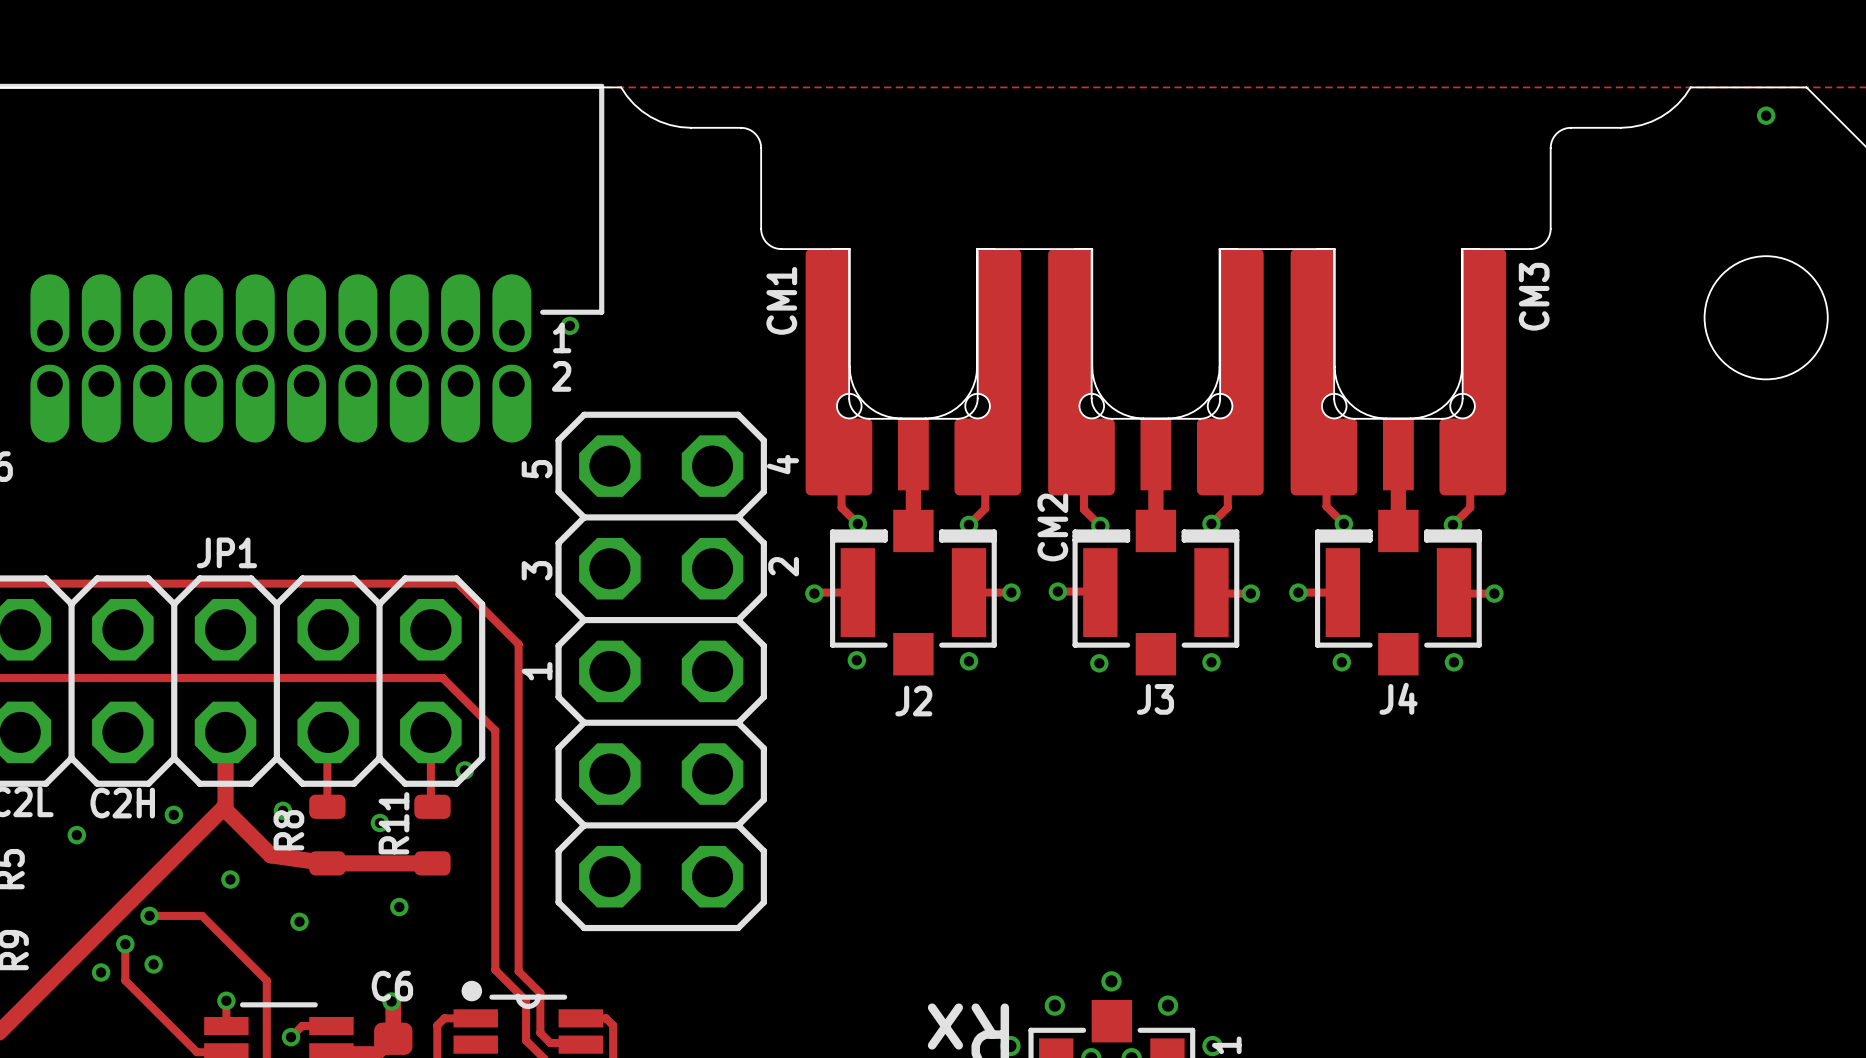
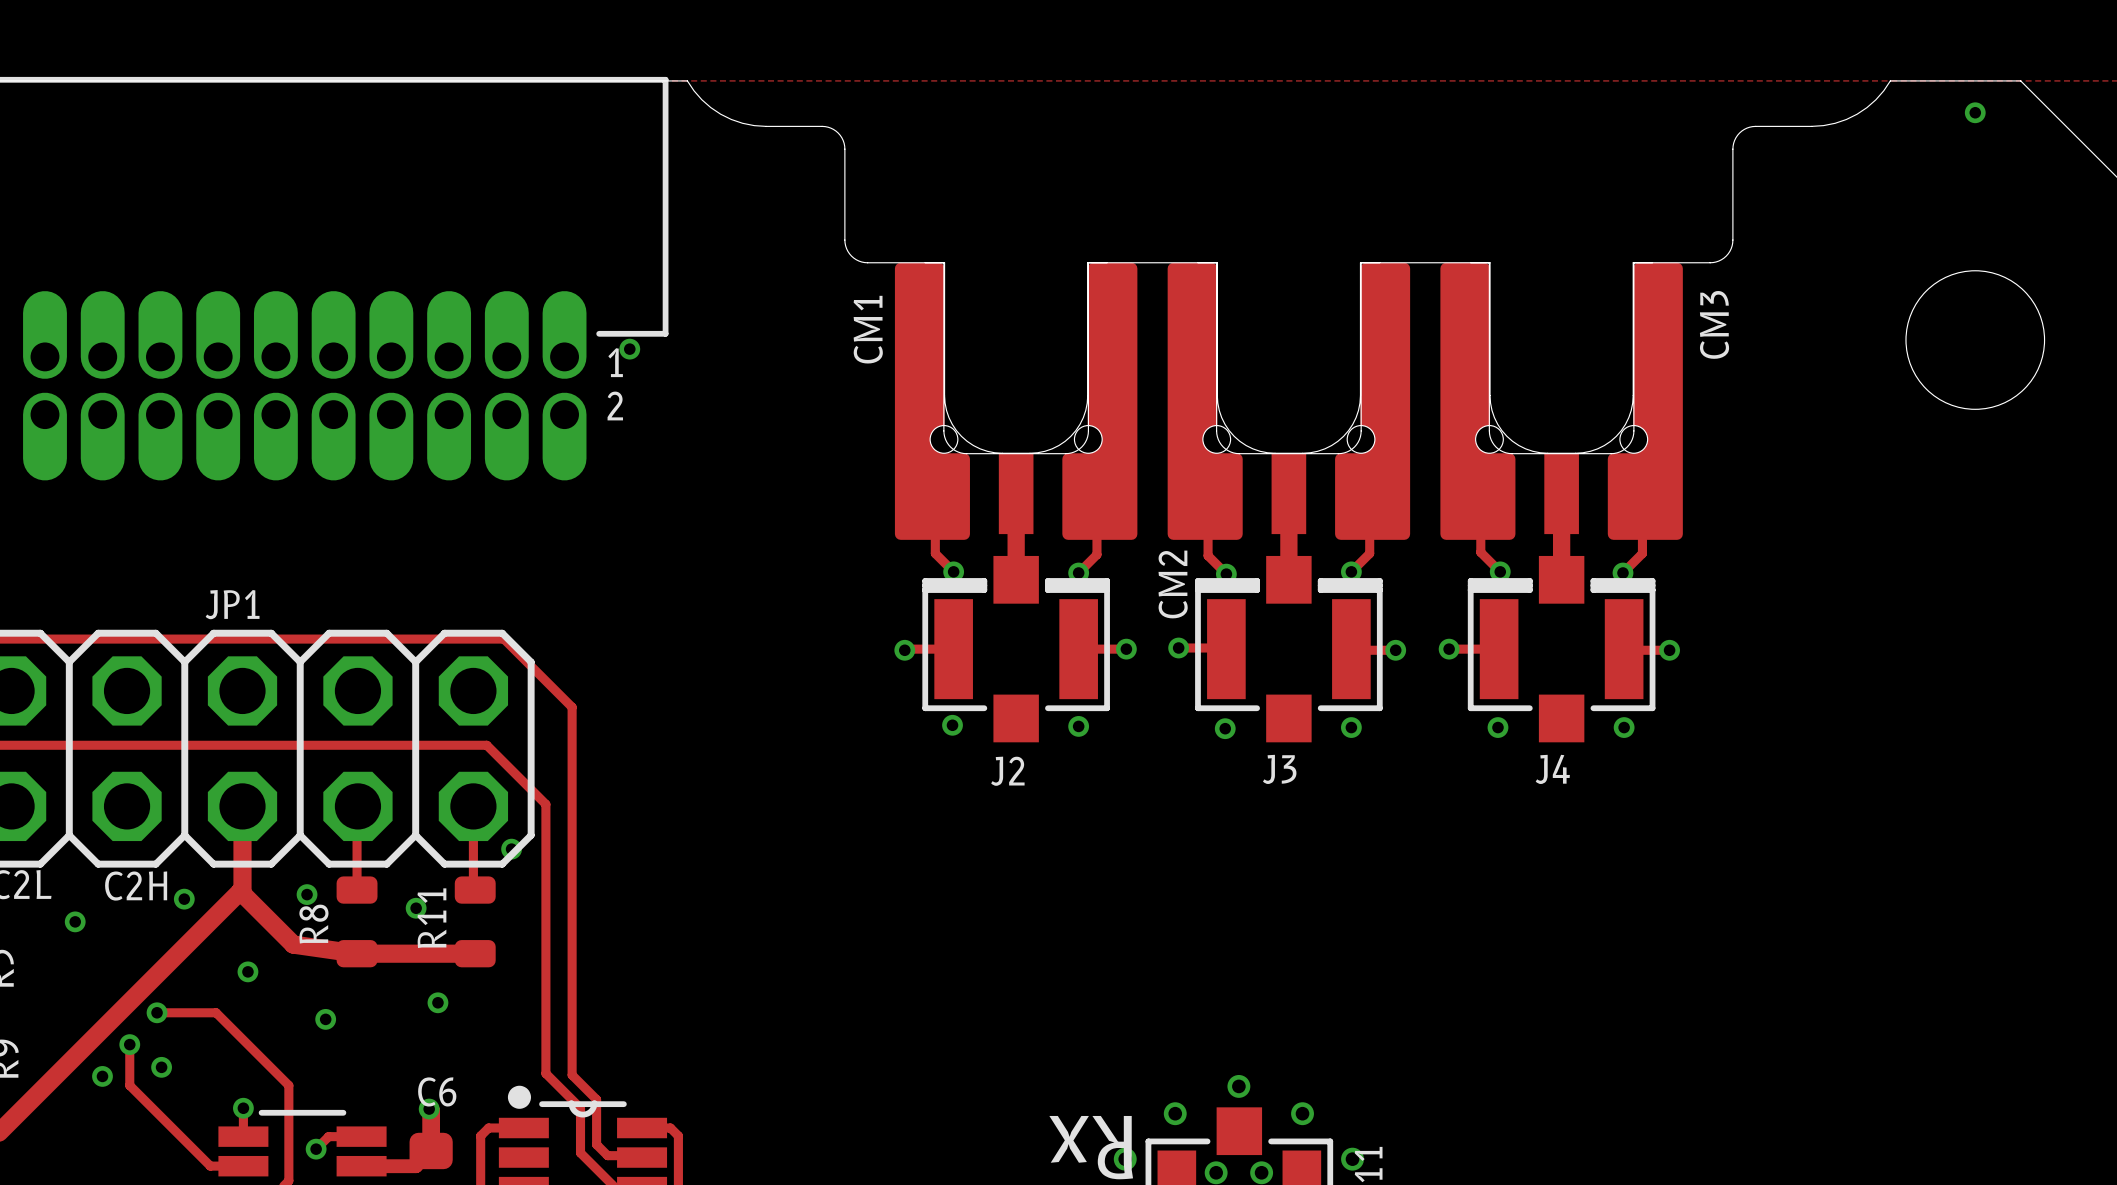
text: 4 (782, 464) -> none
text: 5 (537, 469) -> none
text: 2 (783, 566) -> none
text: 3 (537, 570) -> none
text: 1 (537, 671) -> none
part: (661, 671) -> none

